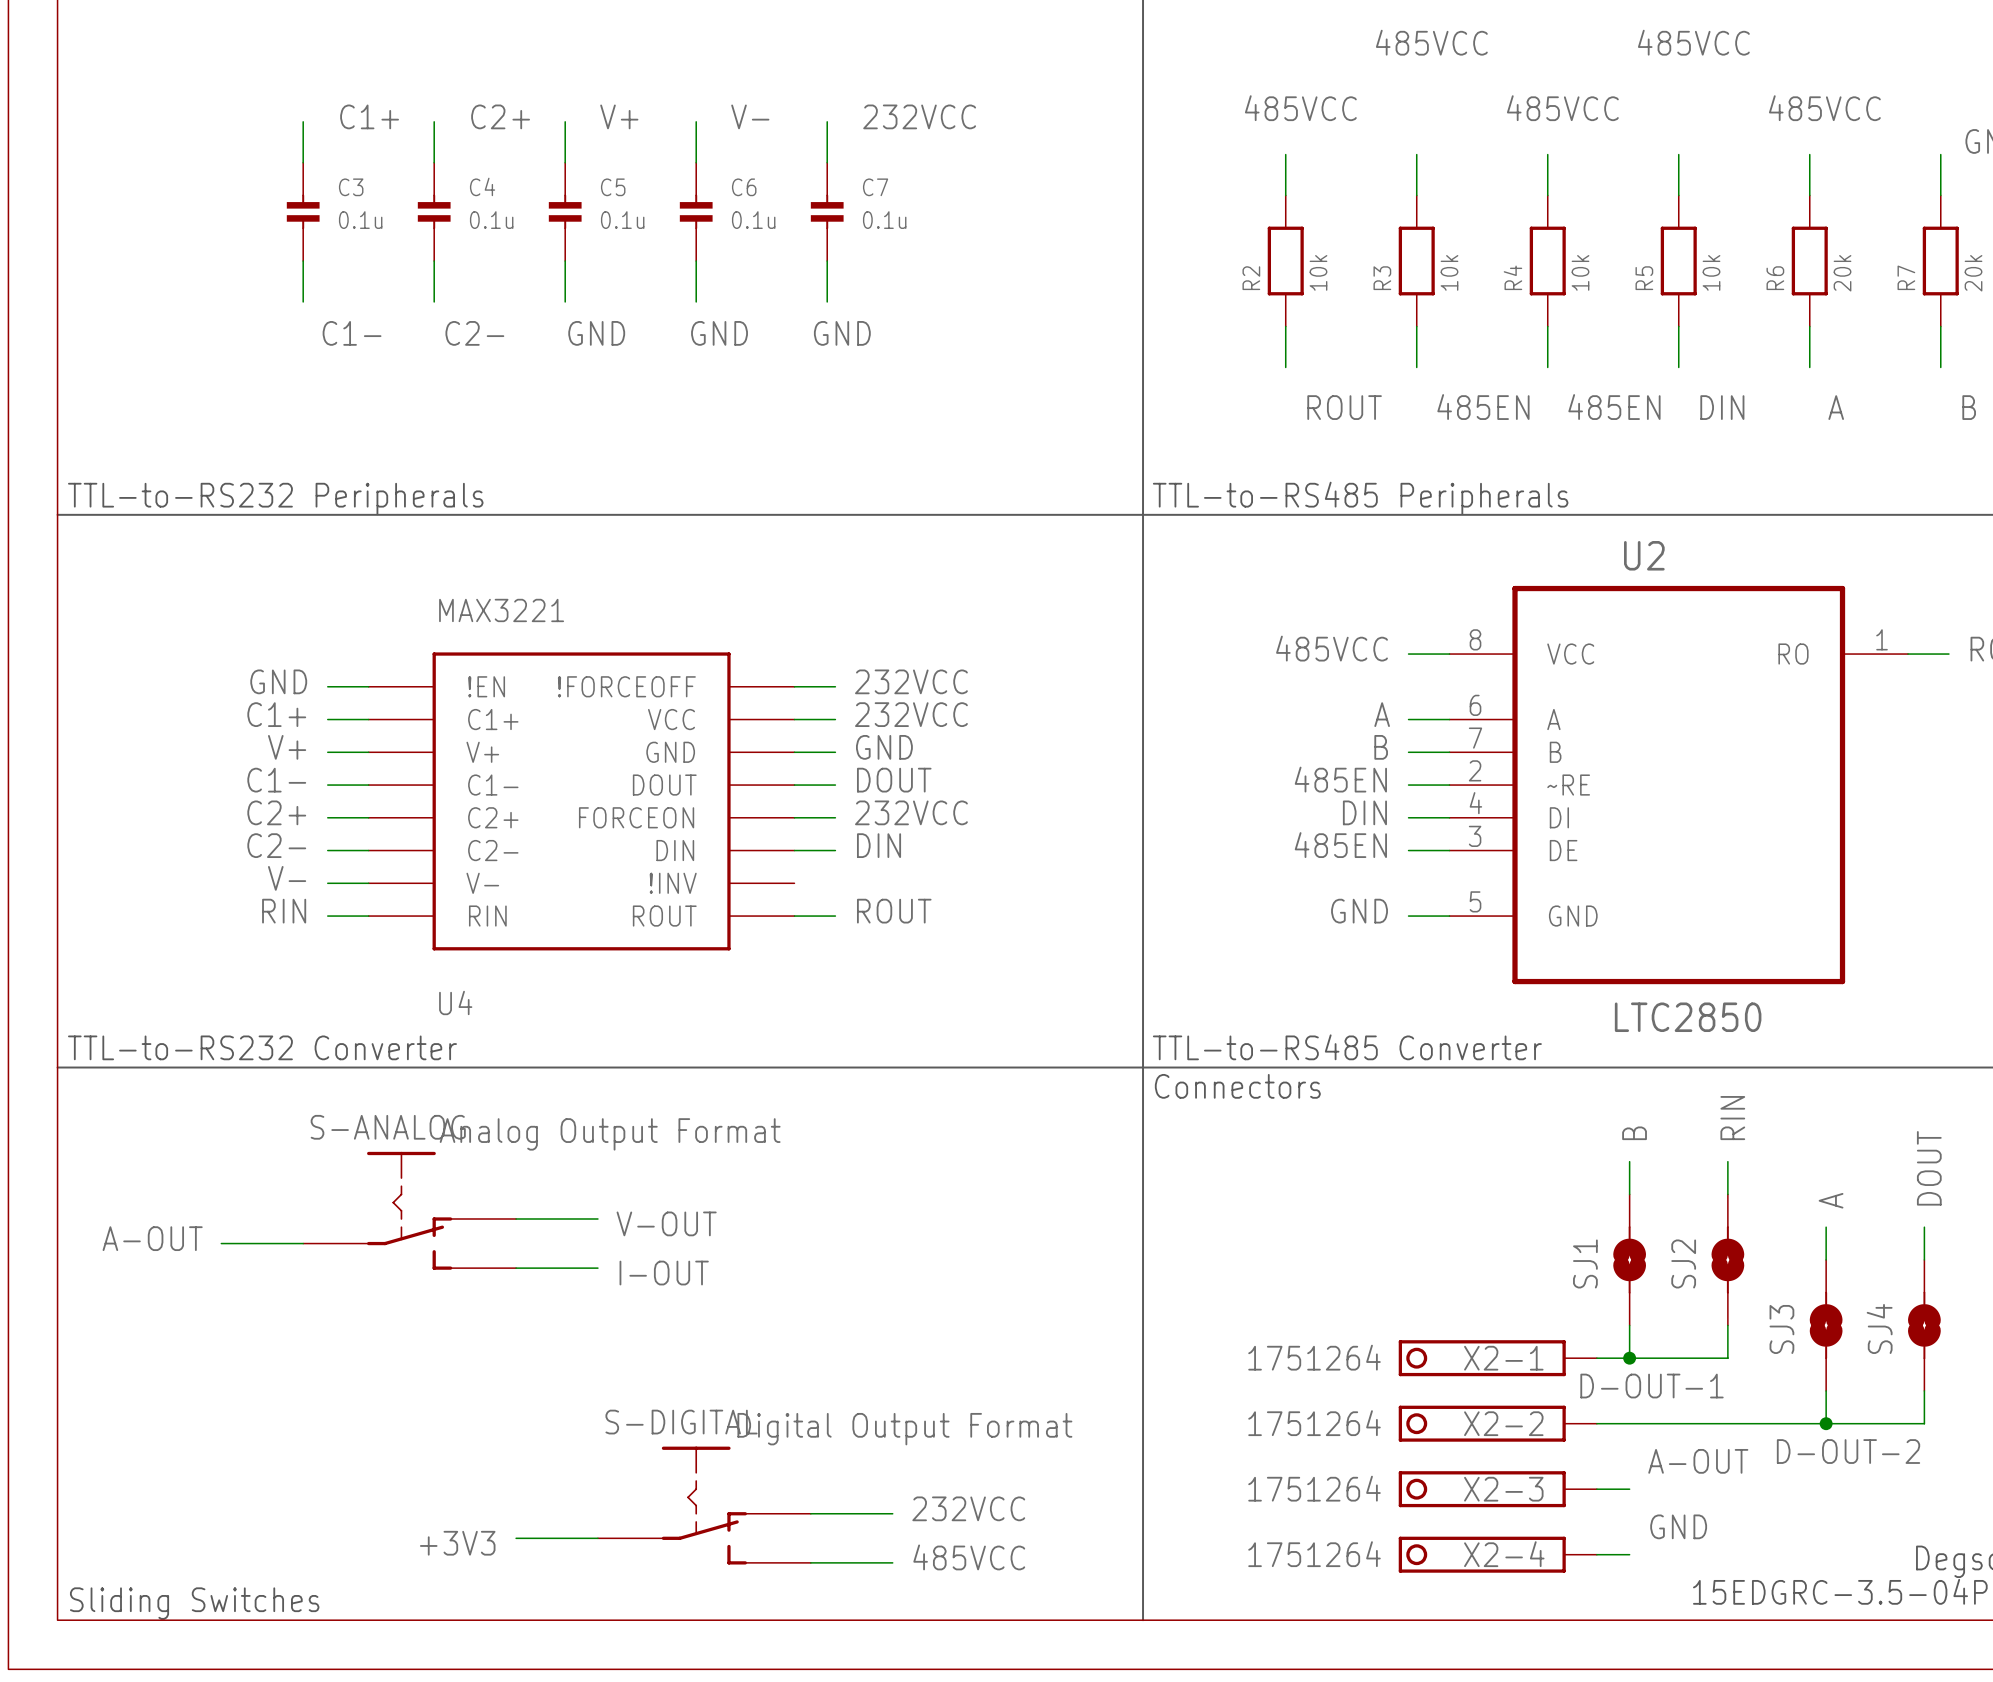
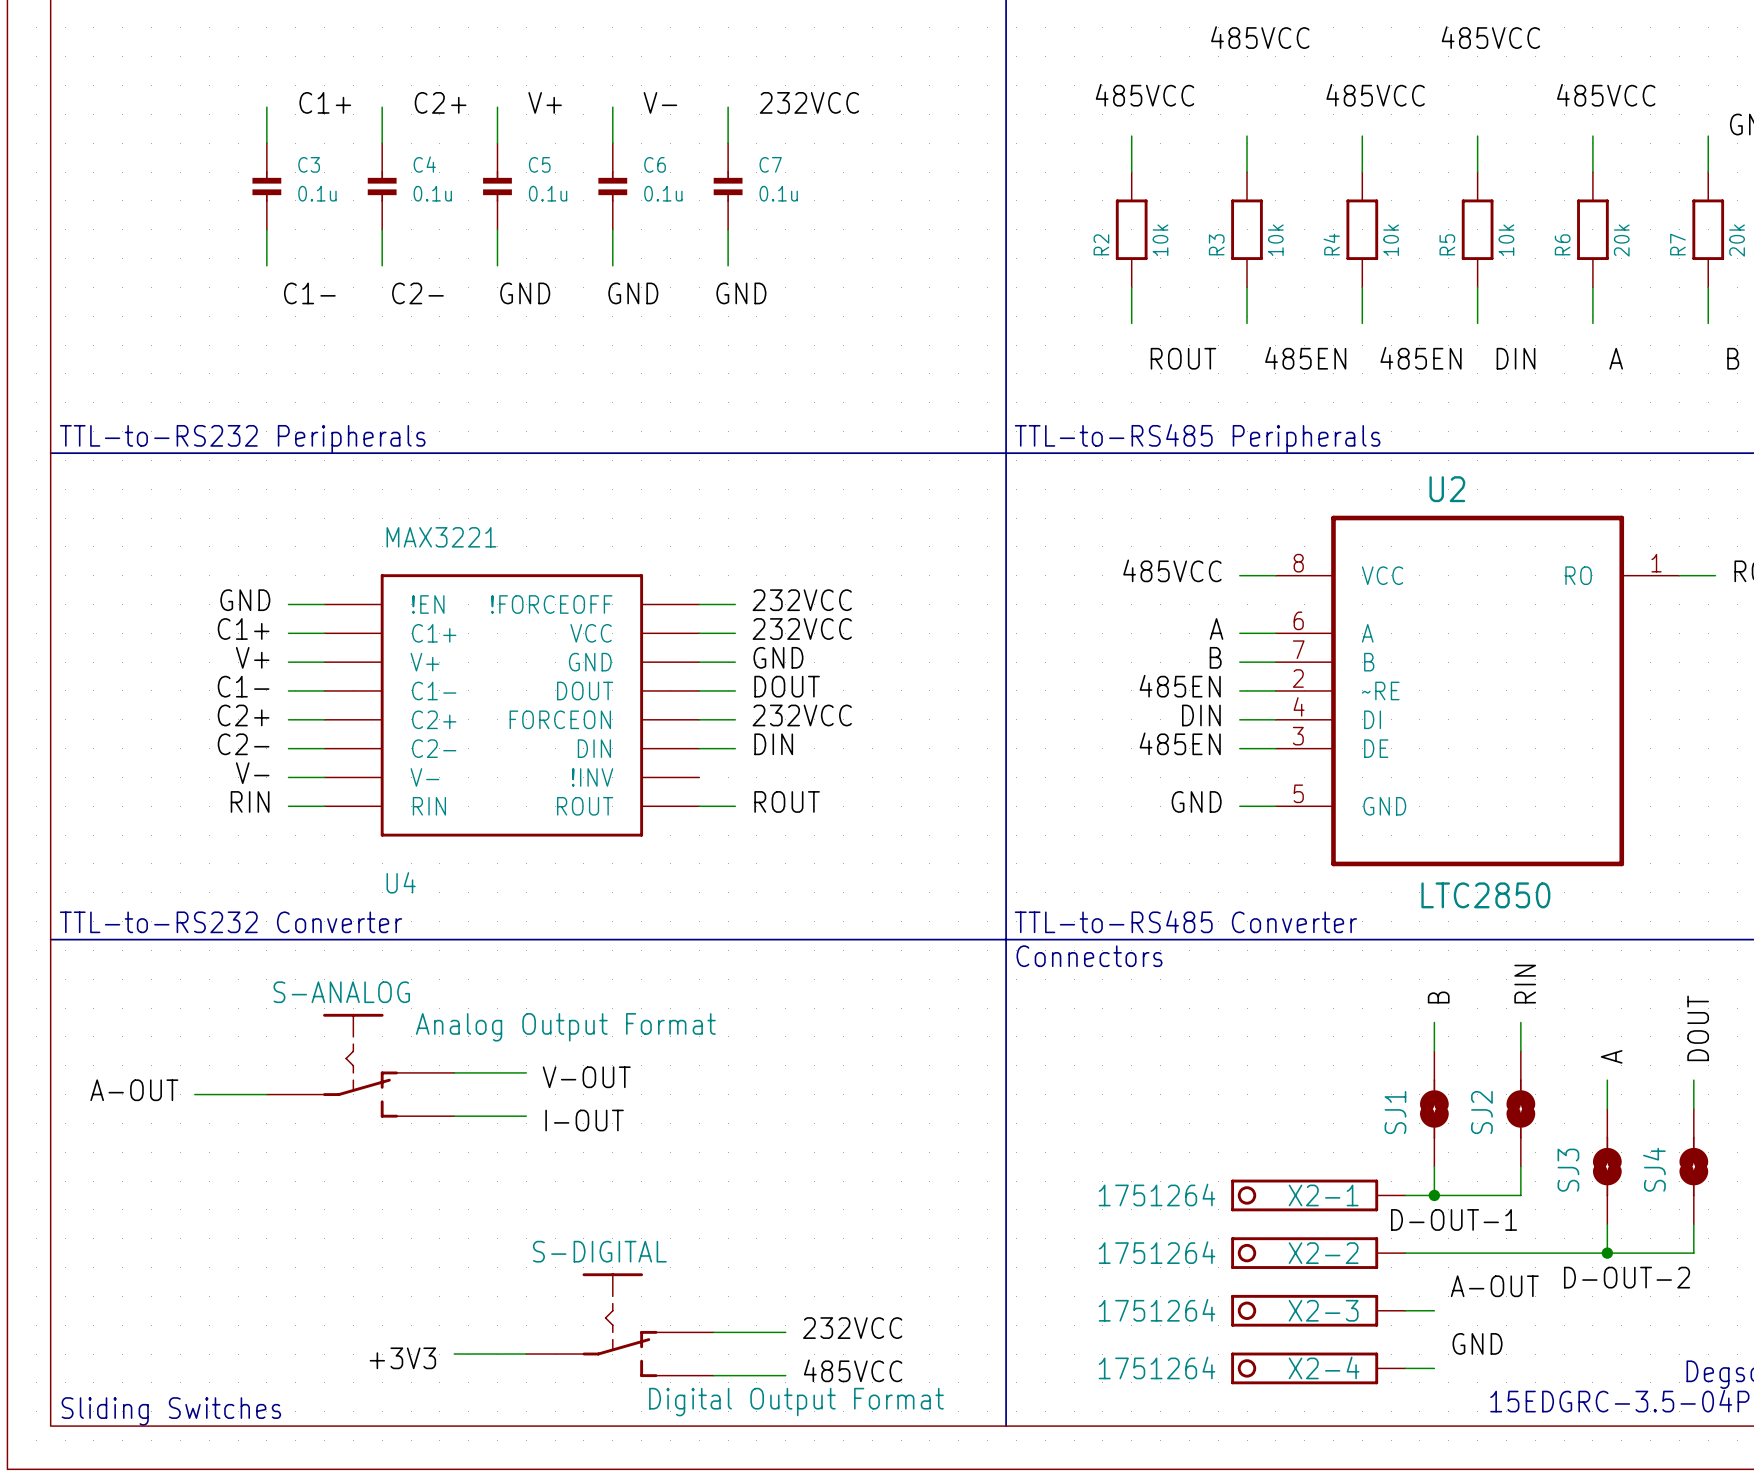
S-ANALOG value position: Analog Output Format (610, 1134) -> Analog Output Format (565, 1027)
S-DIGITAL value position: Digital Output Format (904, 1429) -> Digital Output Format (796, 1402)

